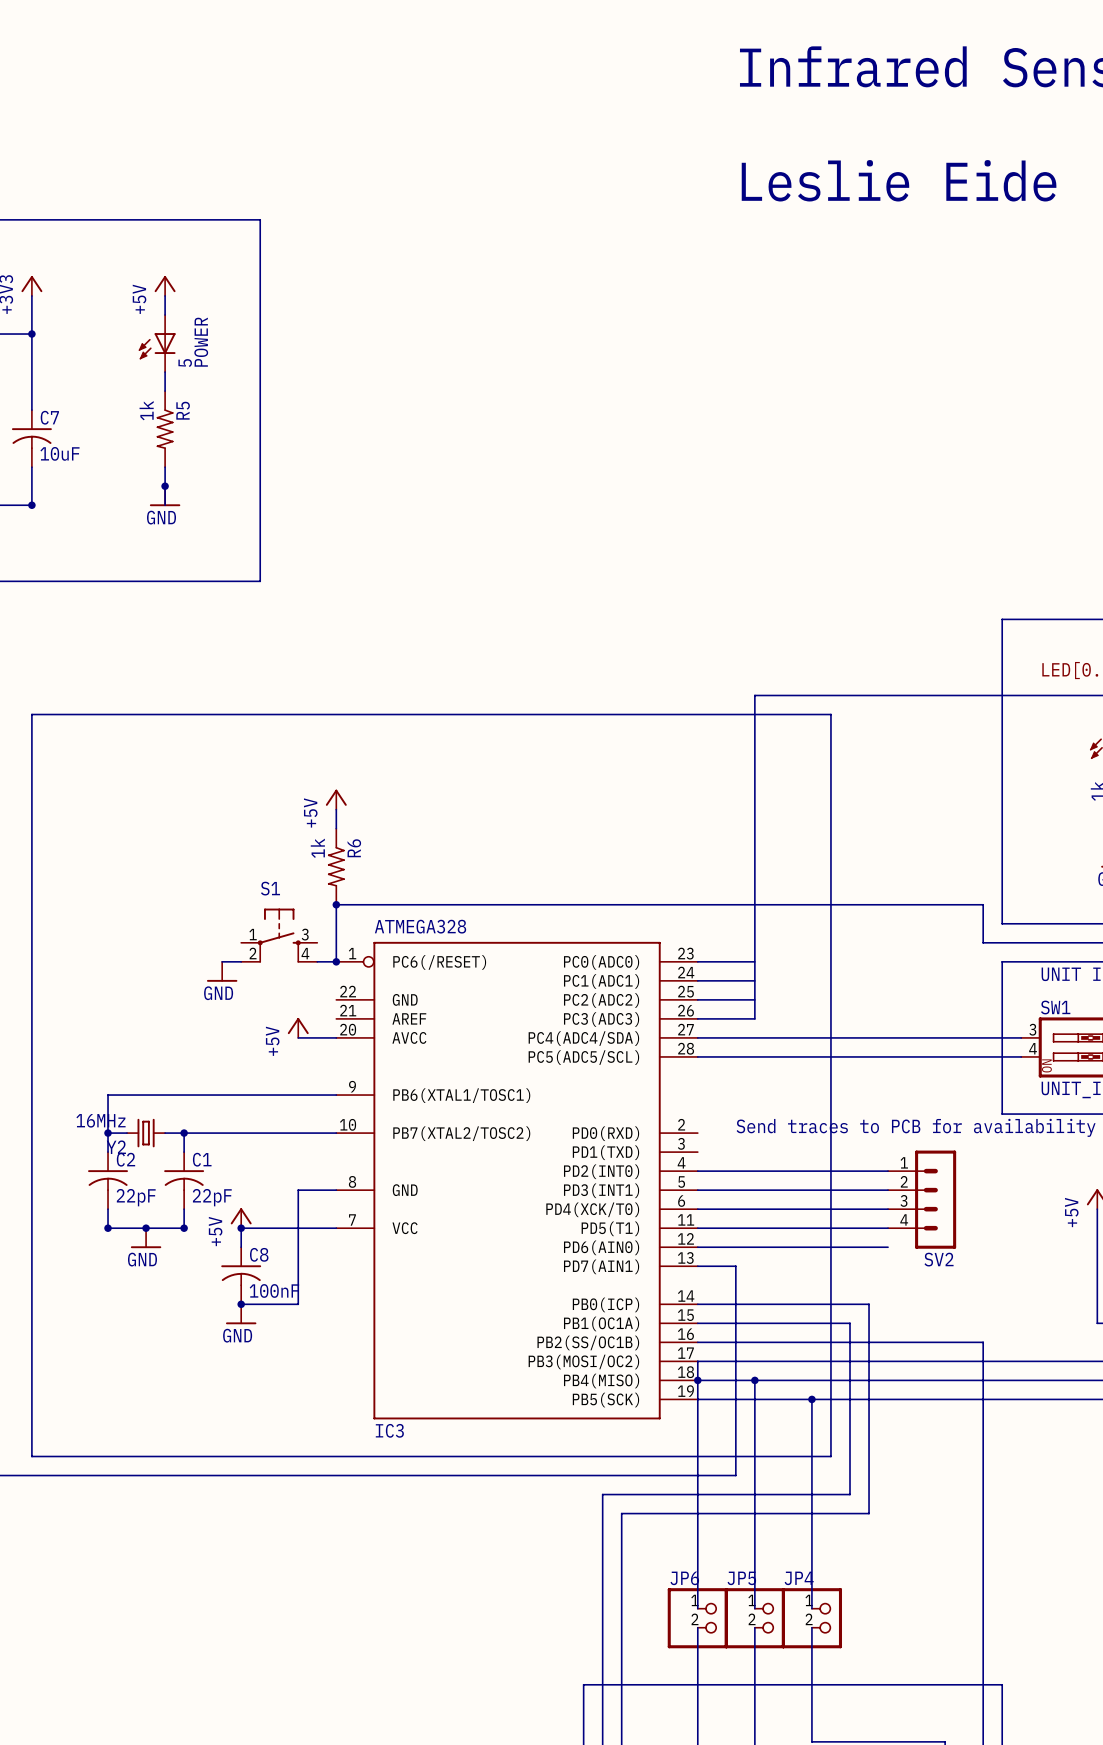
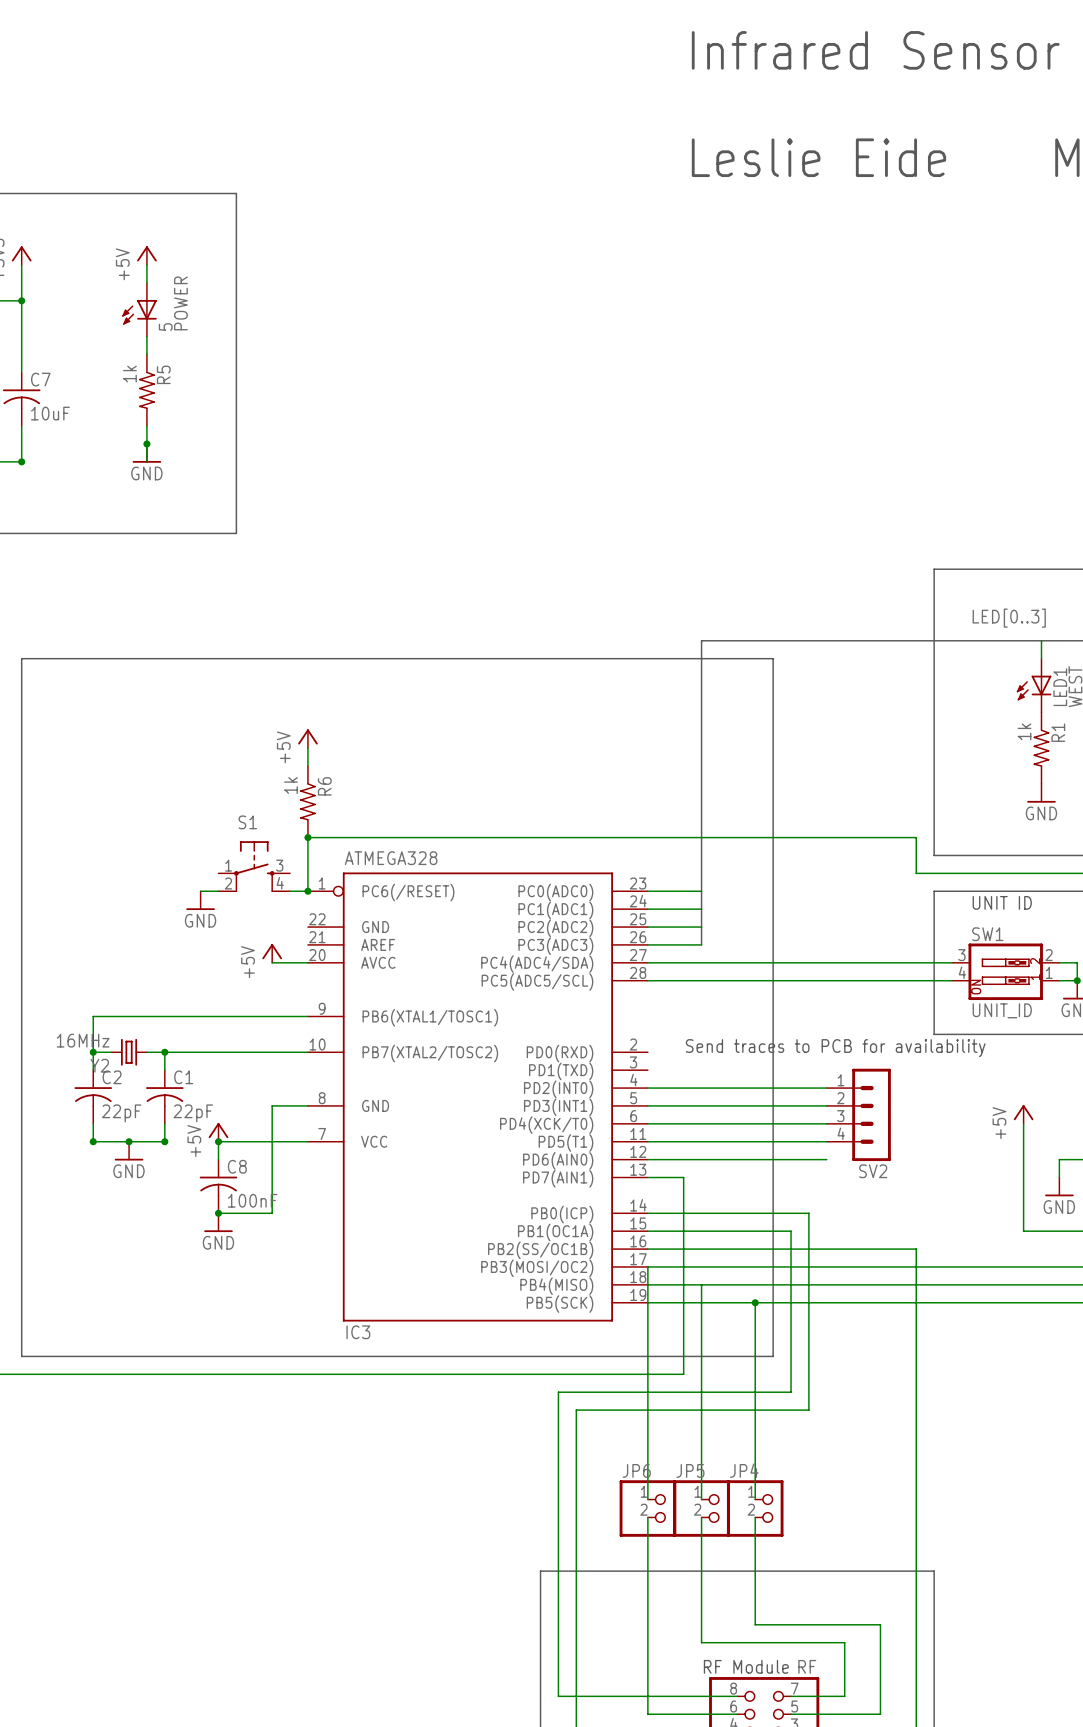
junction: (697, 1380) -> none
junction: (754, 1380) -> none

